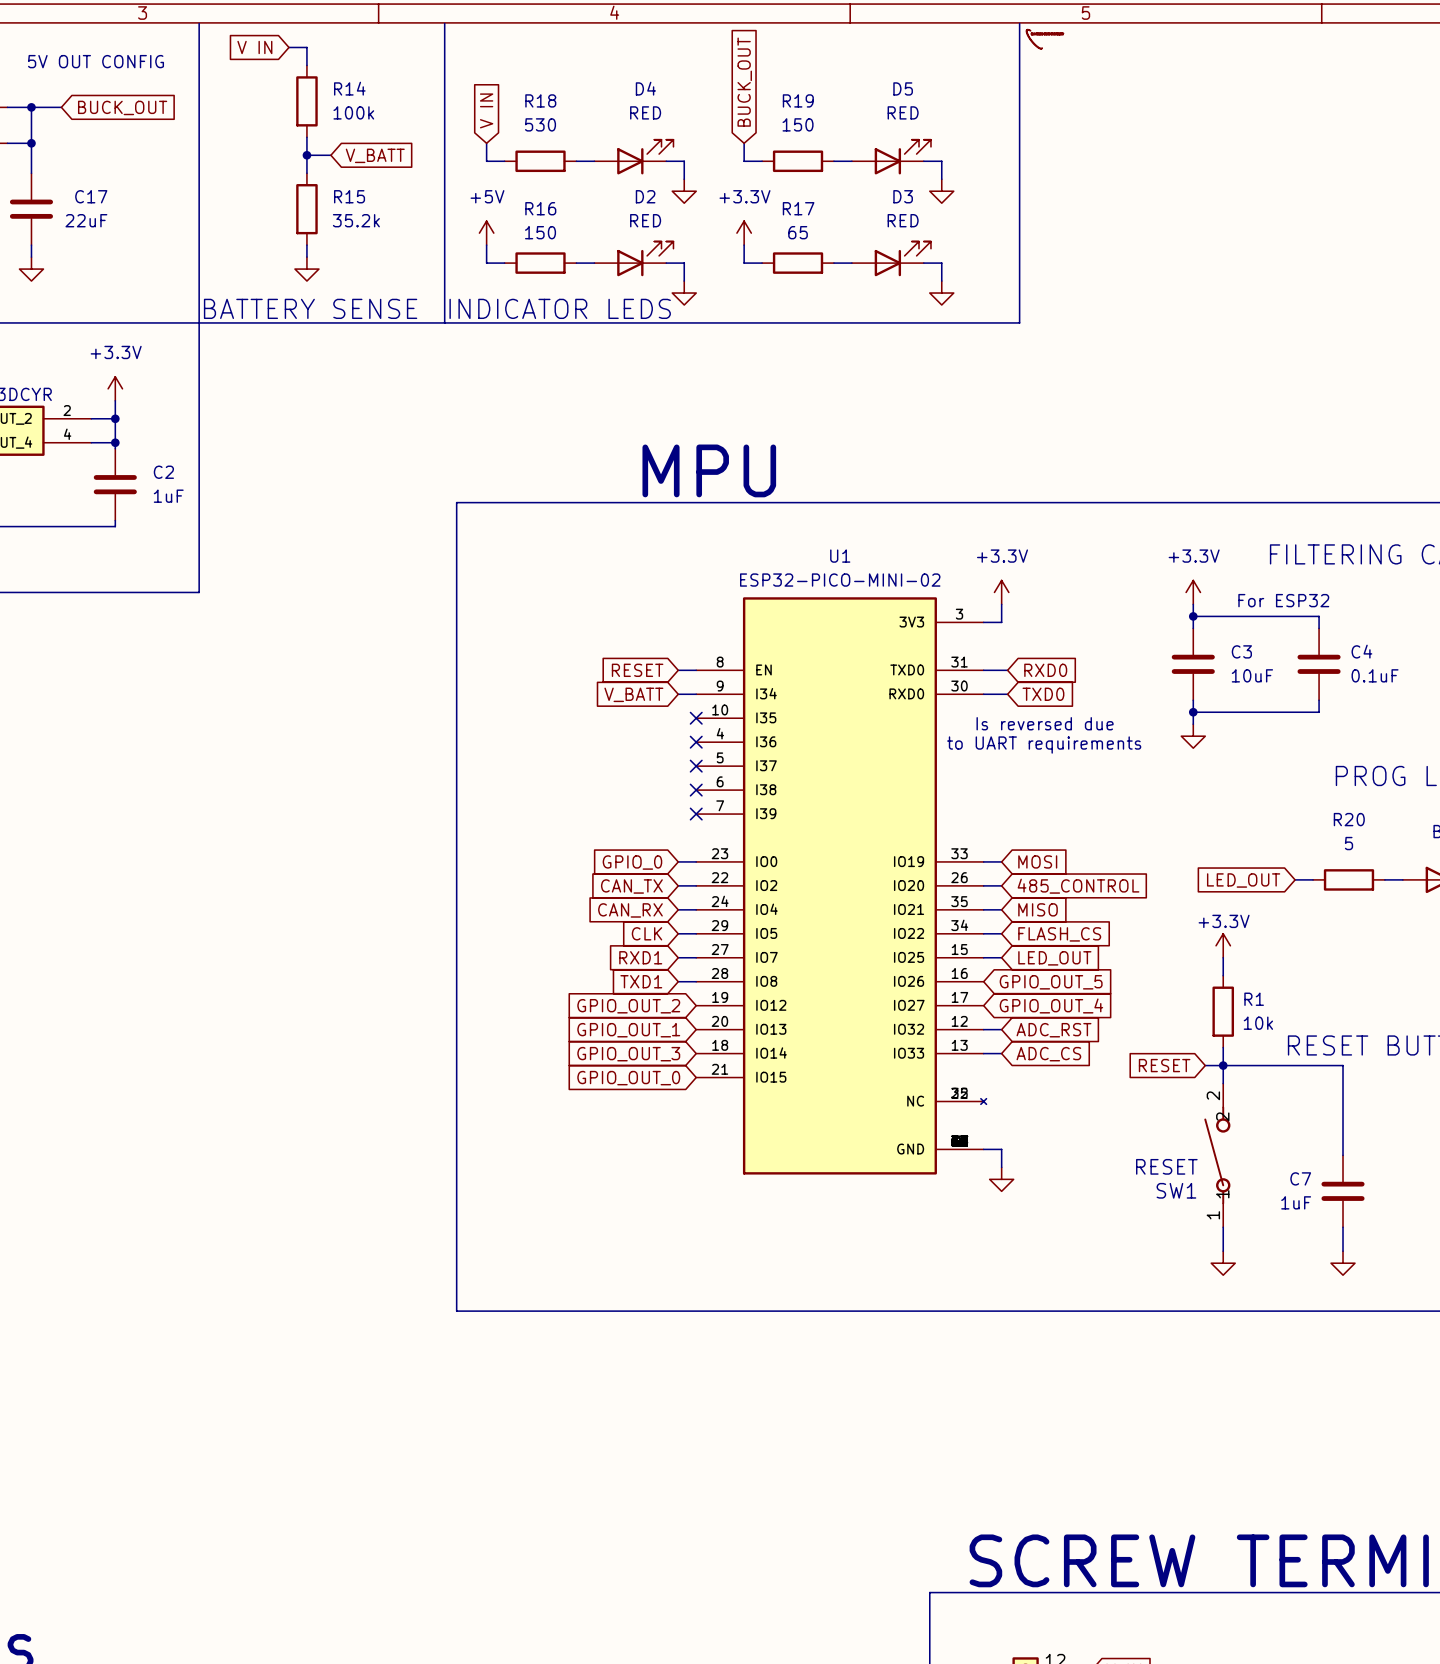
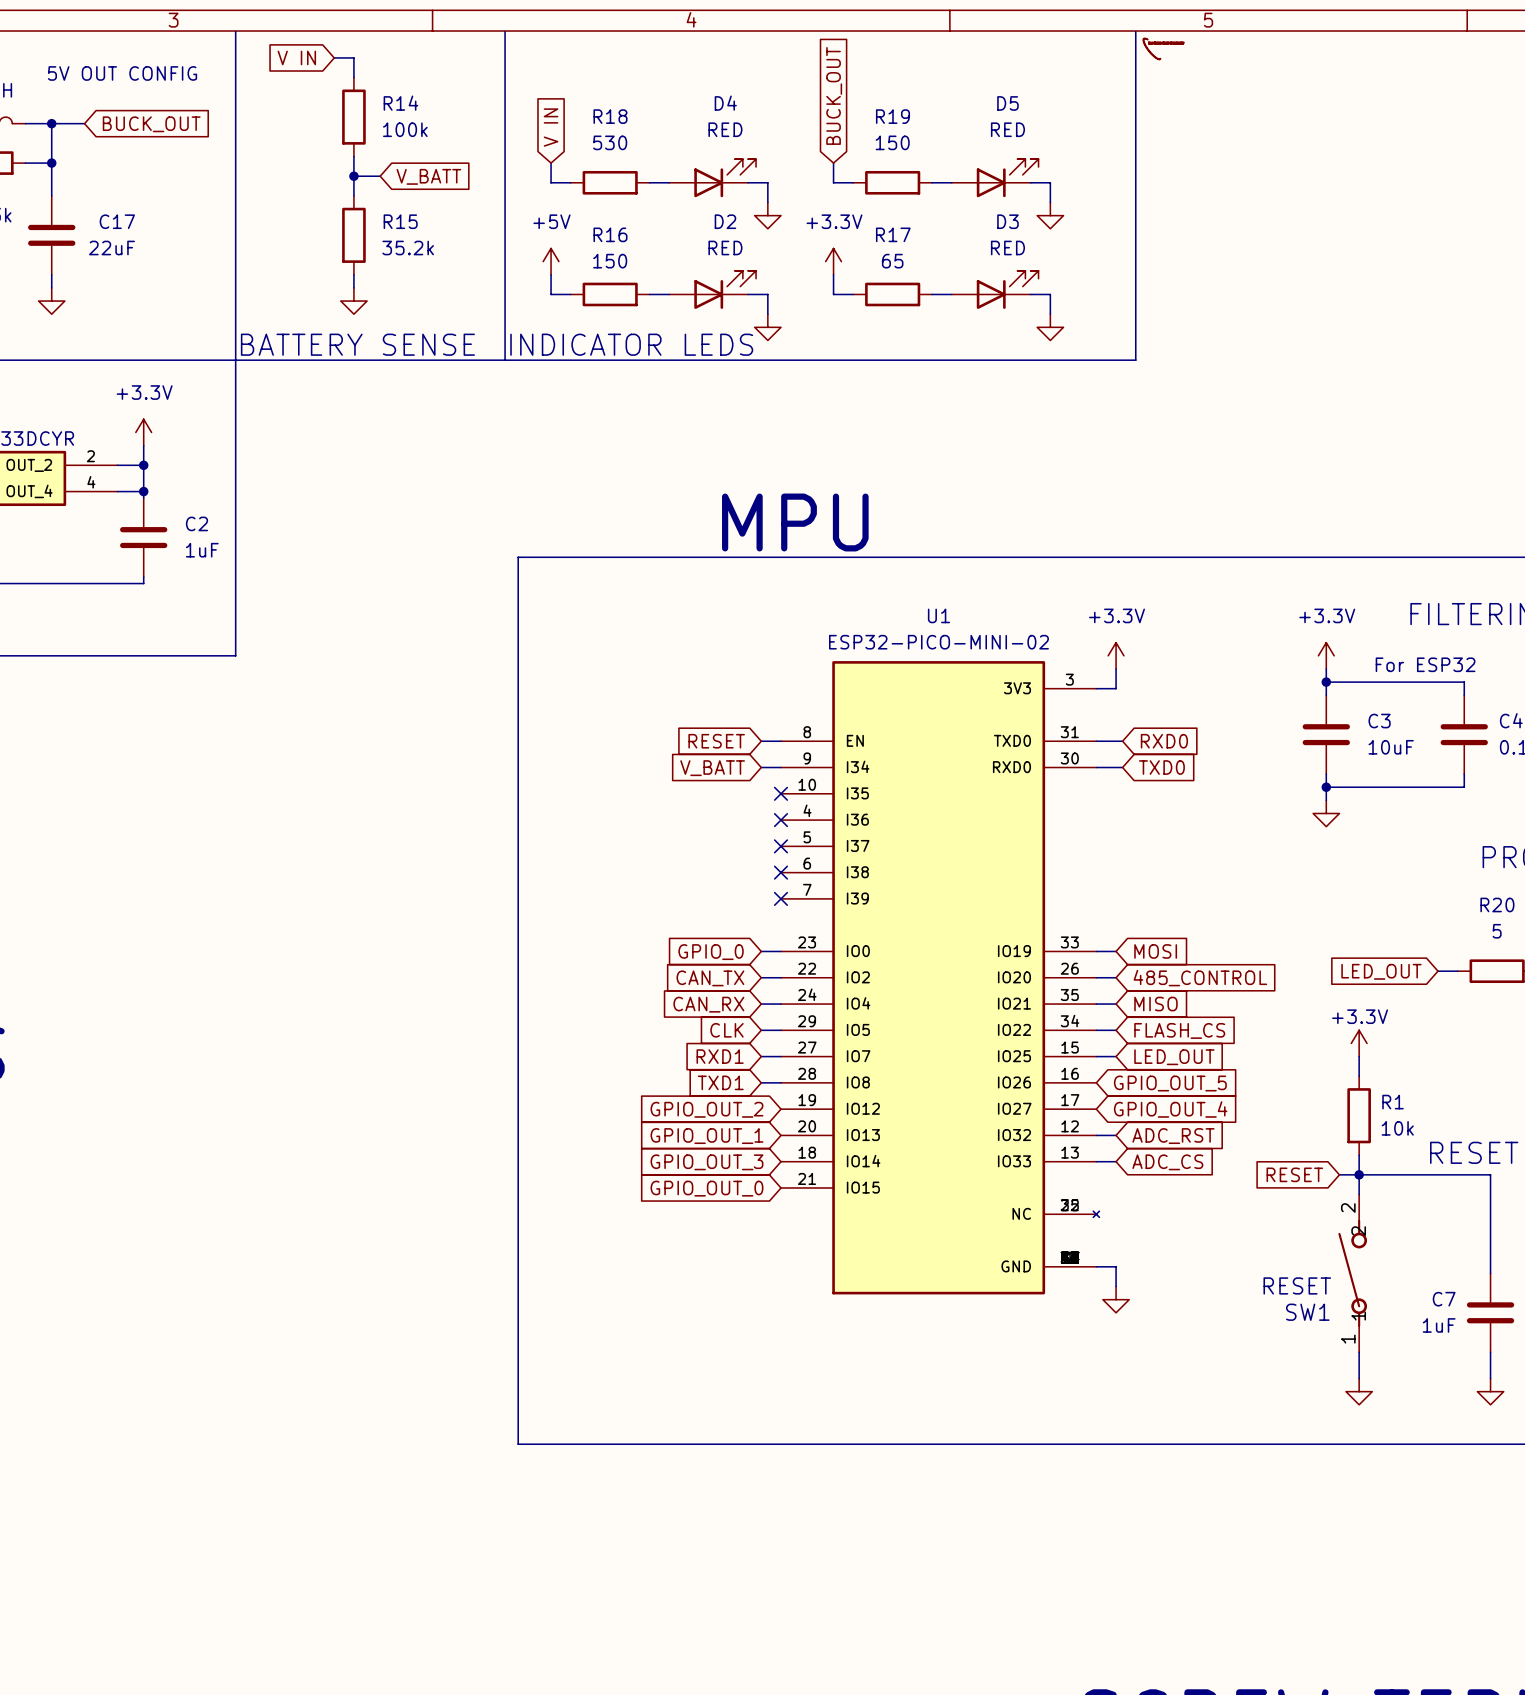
text: Is reversed due (1045, 723) -> none
text: to UART requirements (1044, 745) -> none

